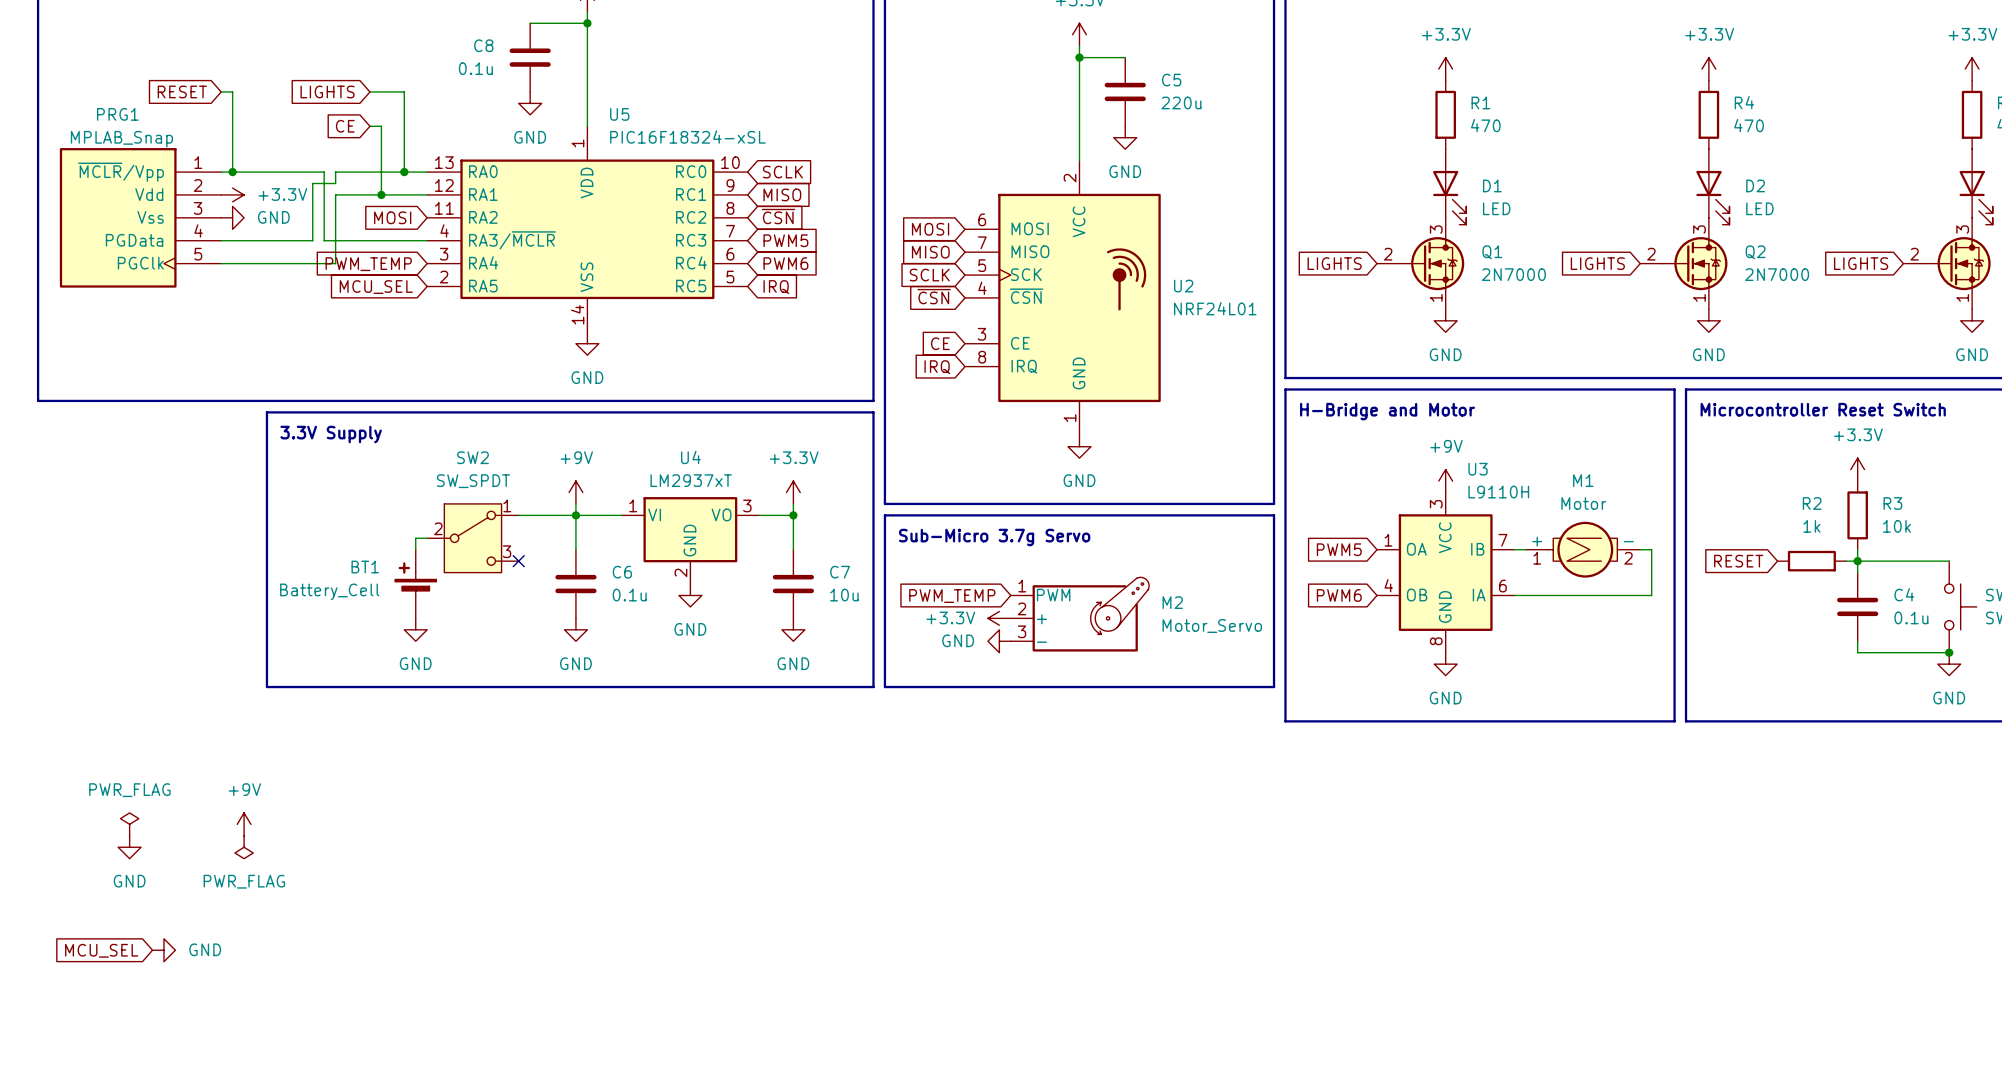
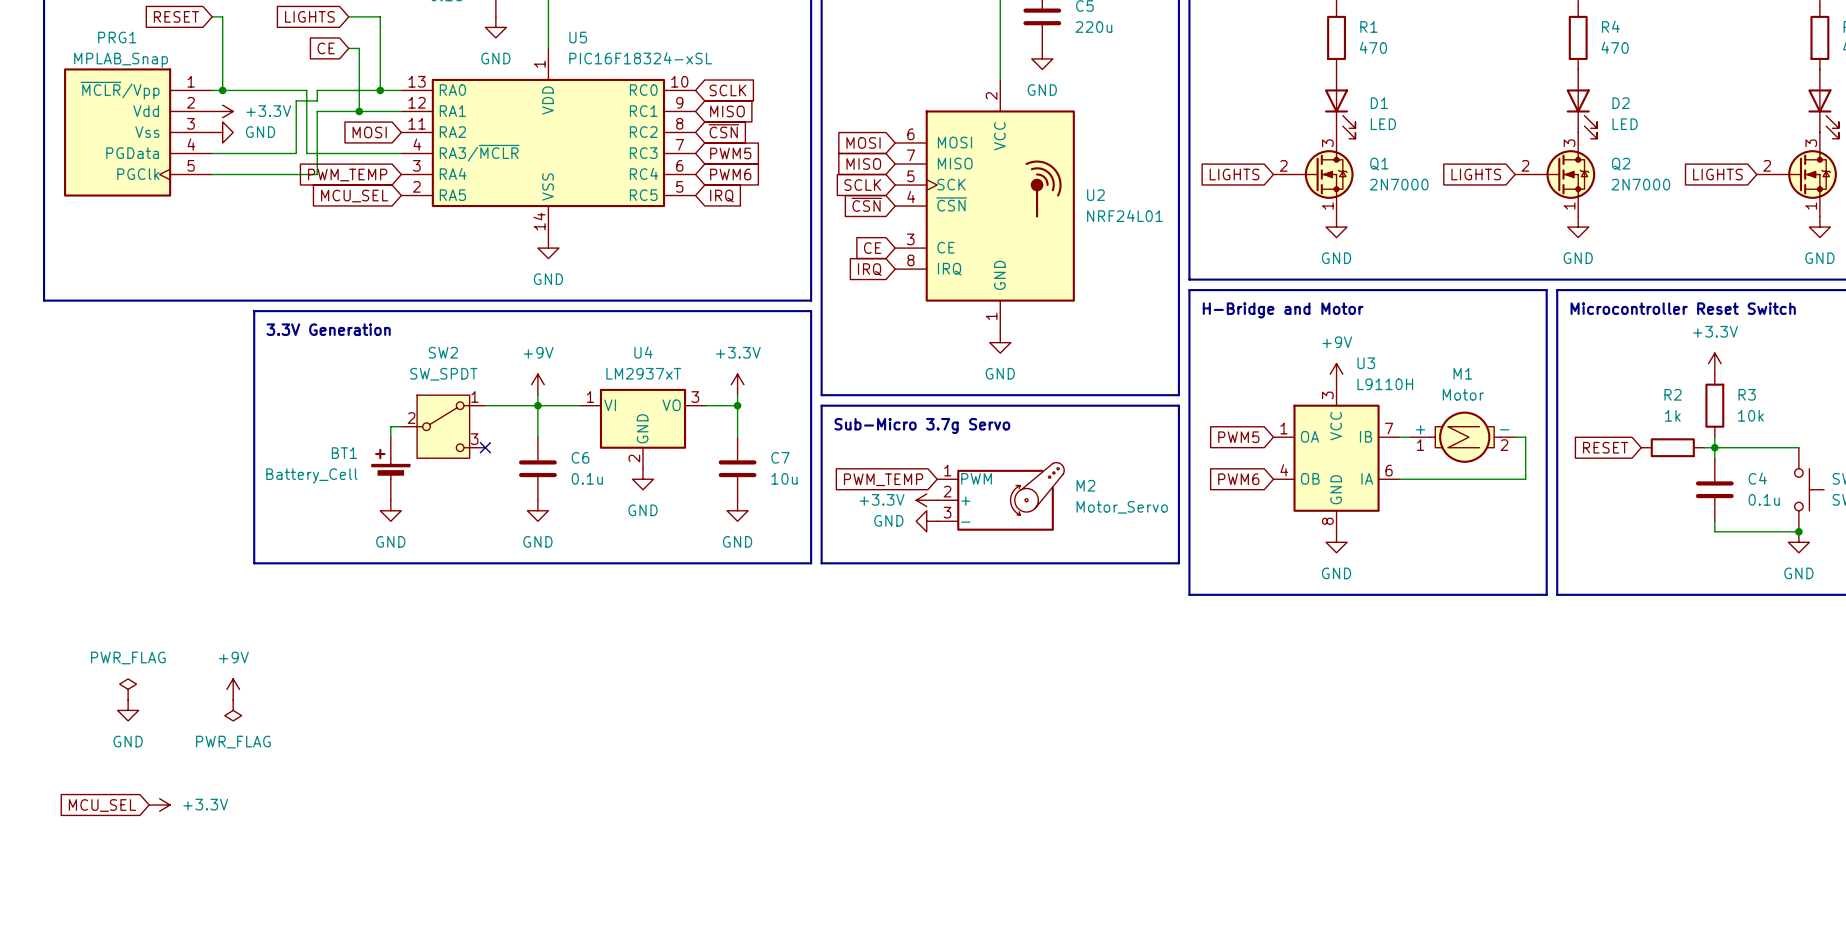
text: 3.3V Supply (331, 434) -> 3.3V Generation (328, 329)
power symbol: GND (163, 950) -> +3.3V (159, 804)

